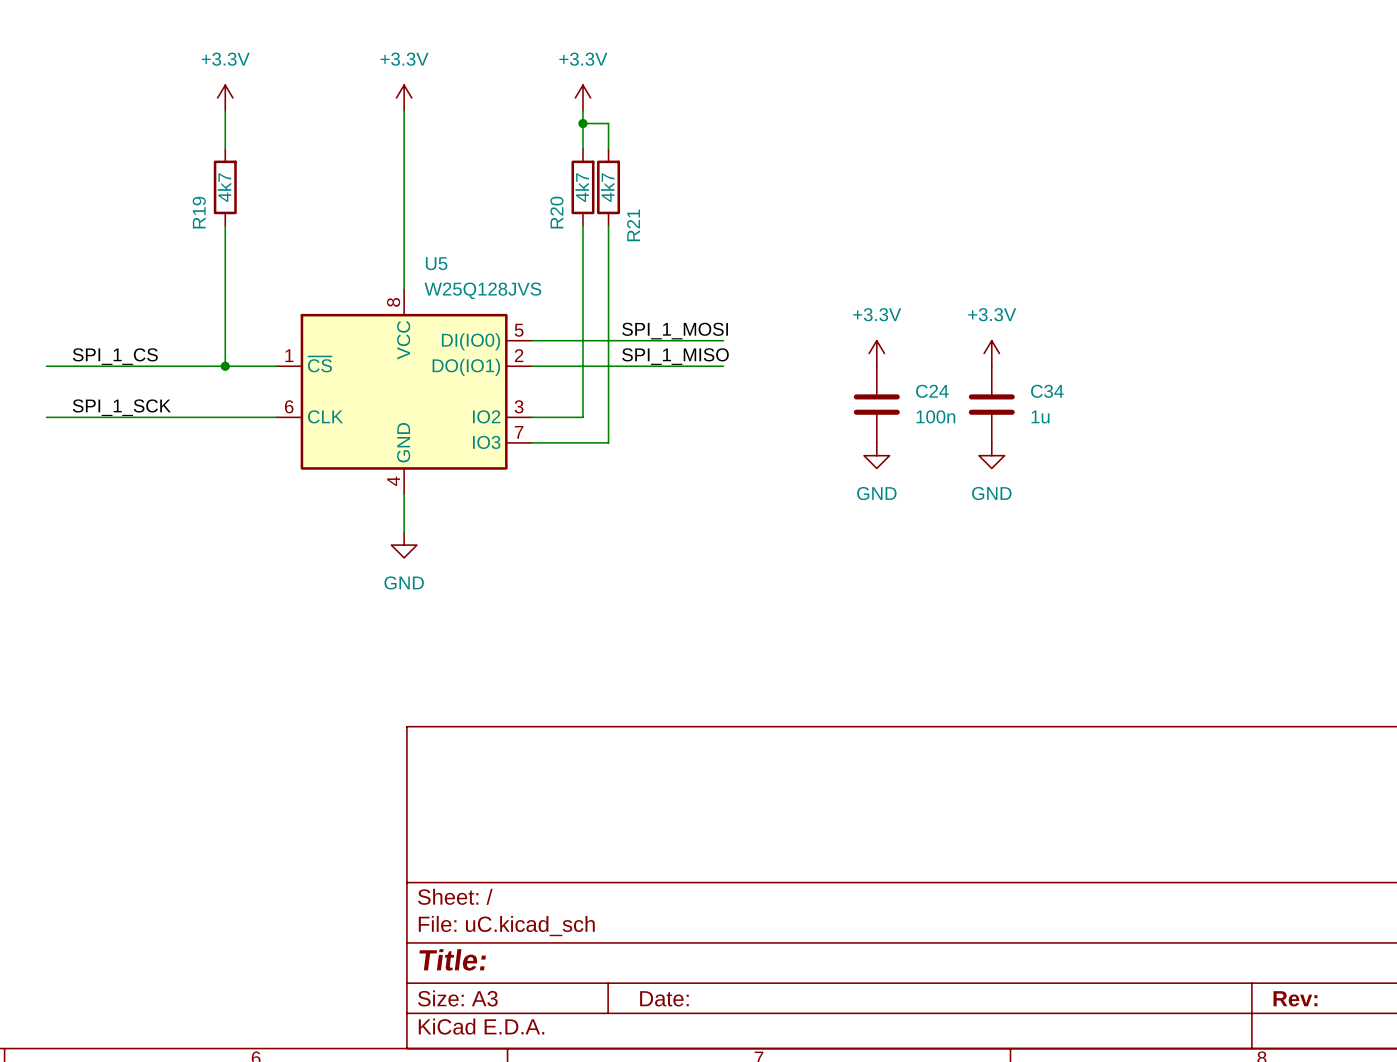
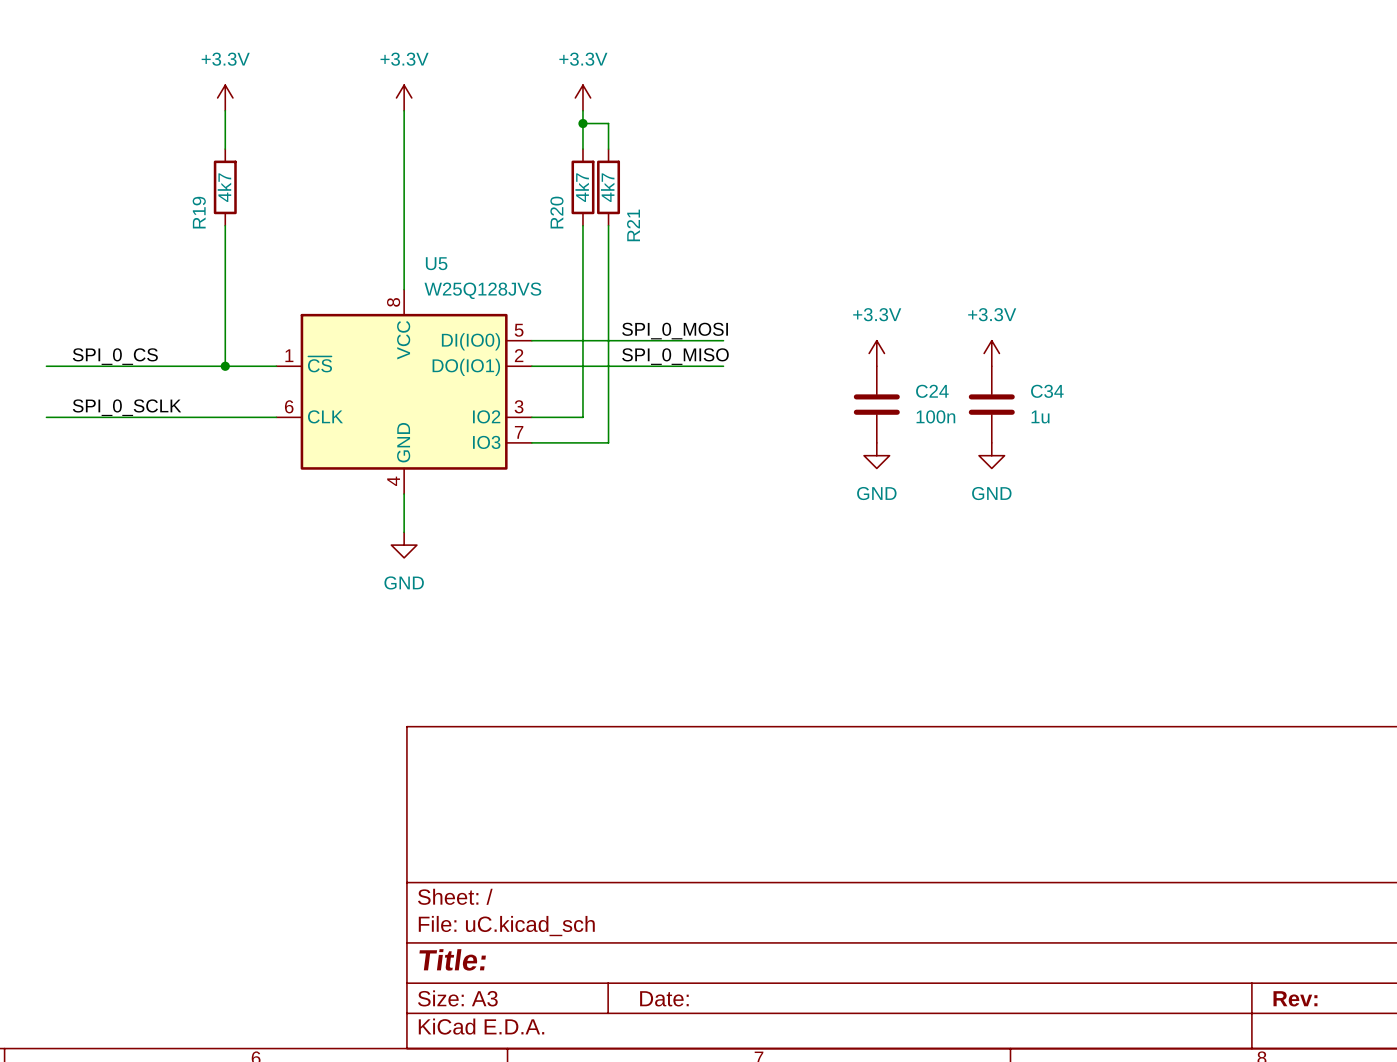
label: SPI_1_MOSI (675, 331) -> SPI_0_MOSI (675, 331)
label: SPI_1_CS (115, 356) -> SPI_0_CS (115, 356)
label: SPI_1_MISO (675, 356) -> SPI_0_MISO (675, 356)
label: SPI_1_SCK (121, 407) -> SPI_0_SCLK (127, 407)

